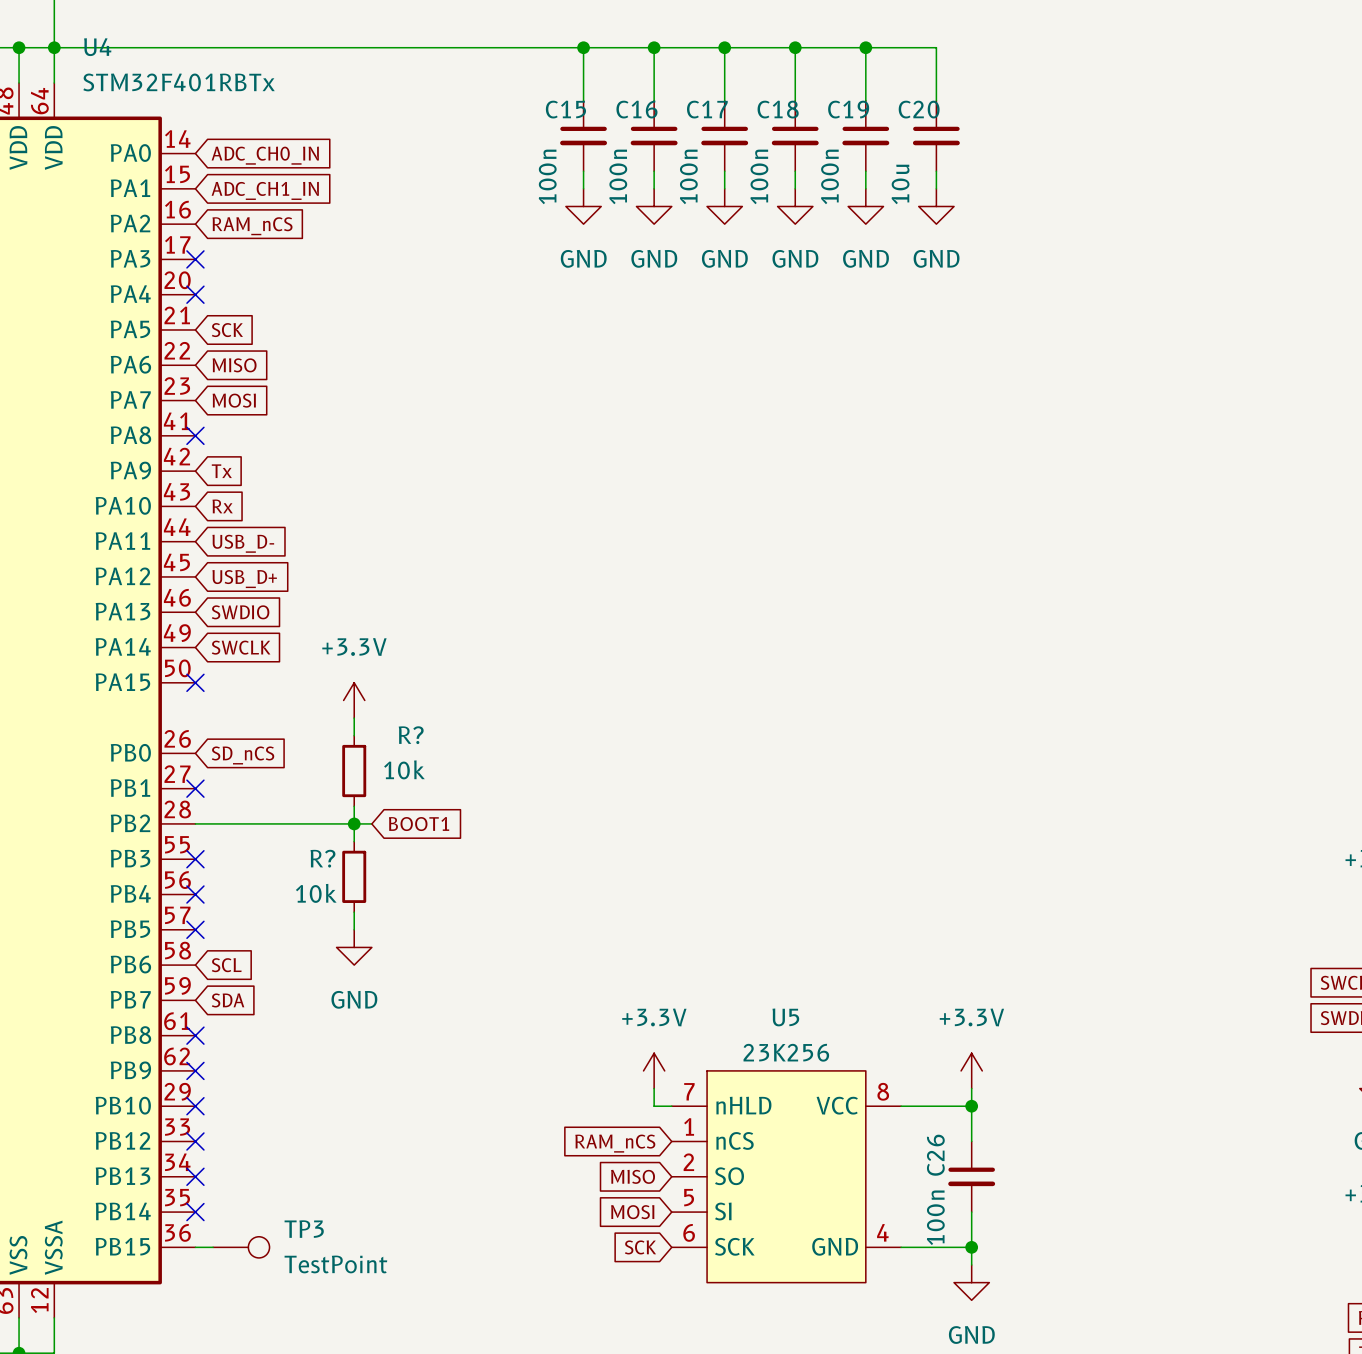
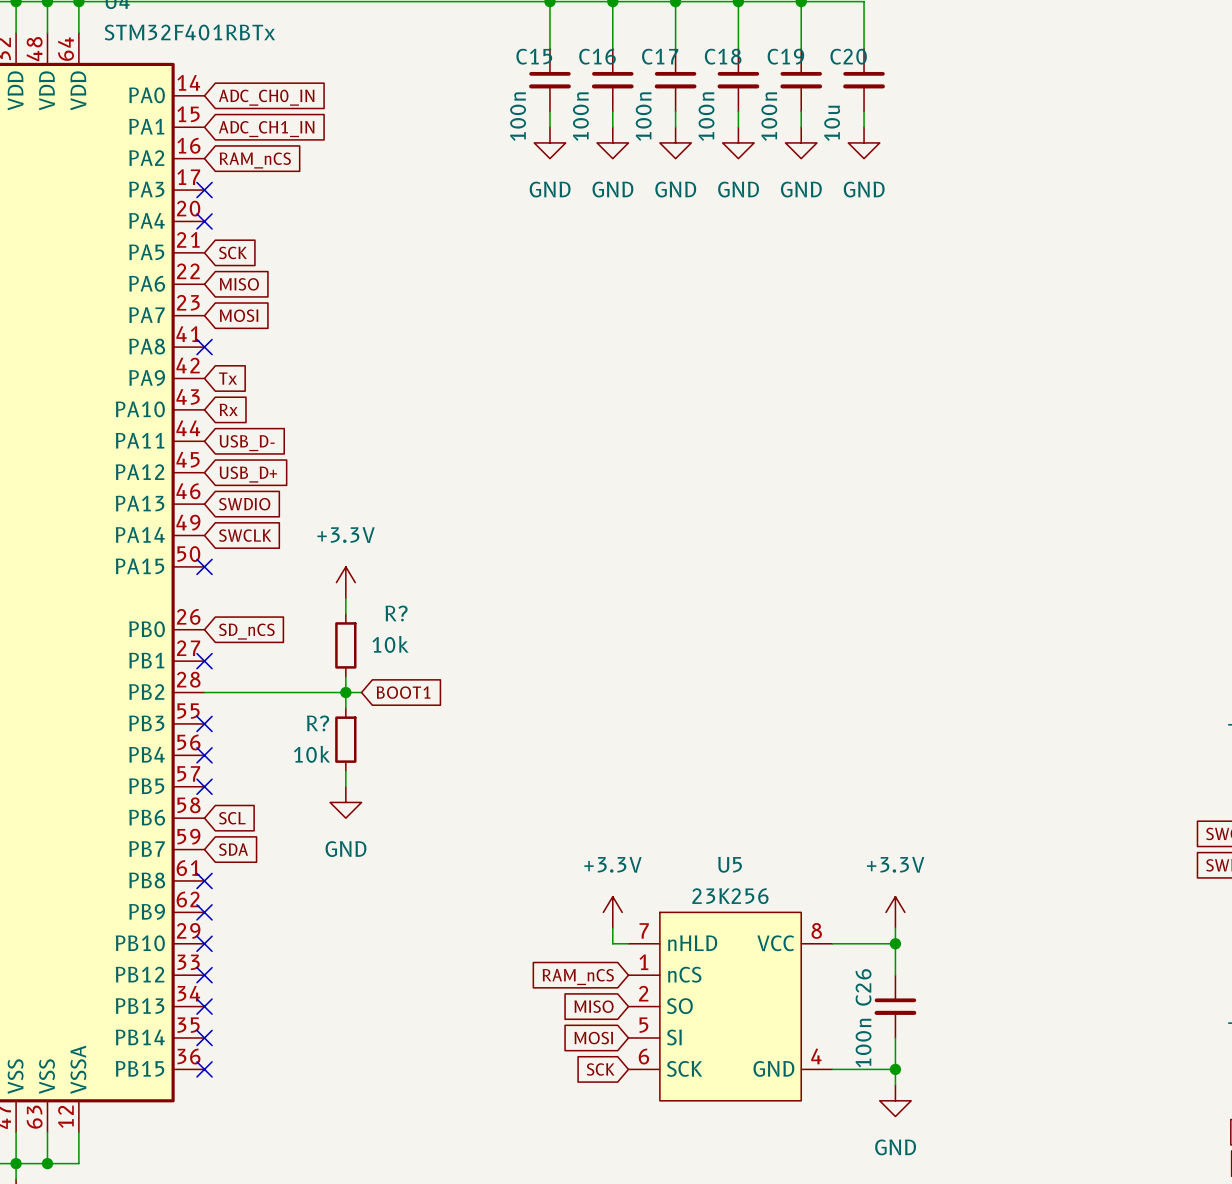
wire: (195, 1247) (213, 1247) -> none
no-connect mark: none -> (204, 1069)
TP3: TestPoint (241, 1247) -> none

